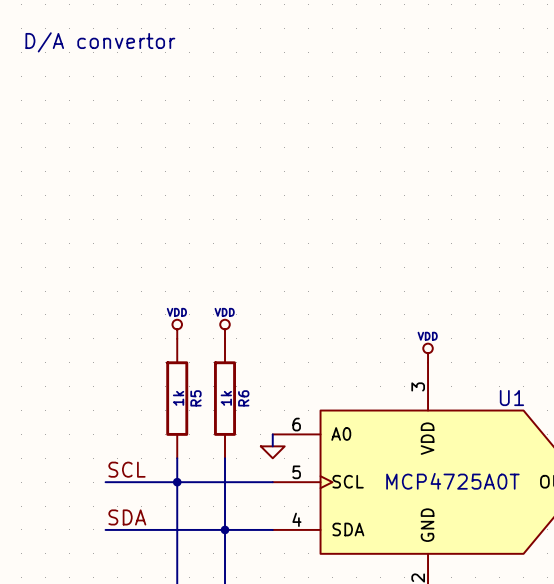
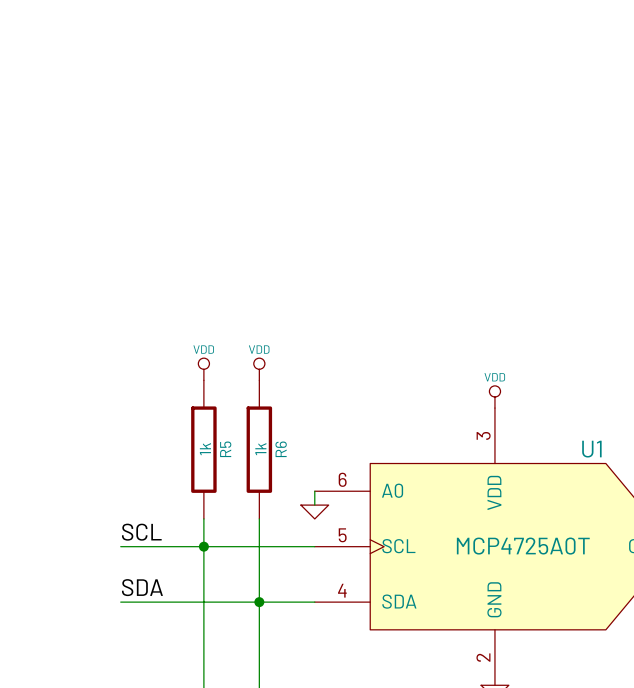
text: D/A convertor (100, 42) -> none

